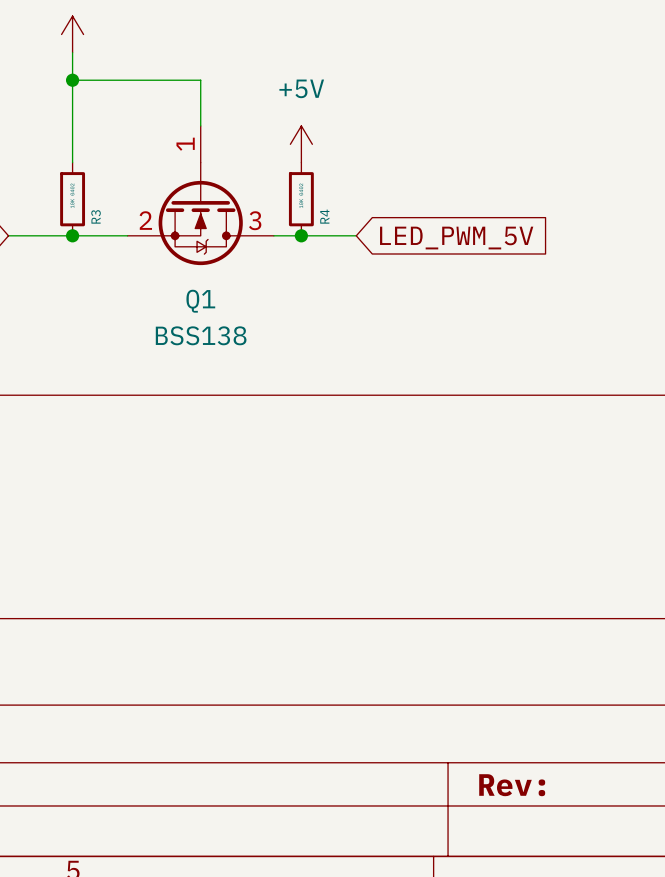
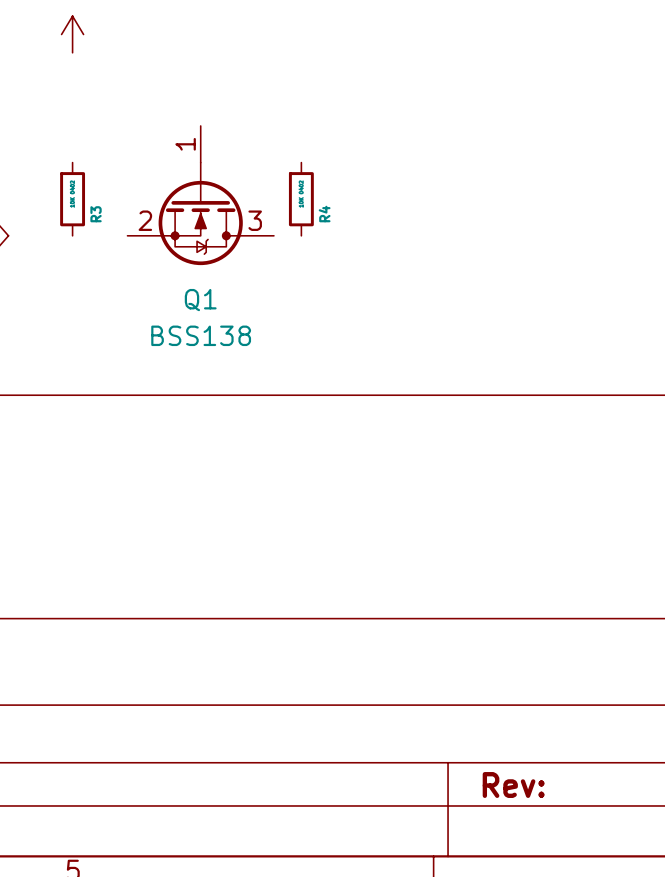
wire: (72, 52) (72, 162) -> none
wire: (72, 80) (200, 80) (200, 125) -> none
junction: (72, 80) -> none
power symbol: +5V (301, 144) -> none
wire: (8, 235) (127, 235) -> none
junction: (72, 235) -> none
wire: (273, 235) (356, 235) -> none
junction: (301, 235) -> none
global label: LED_PWM_5V (456, 238) -> none

